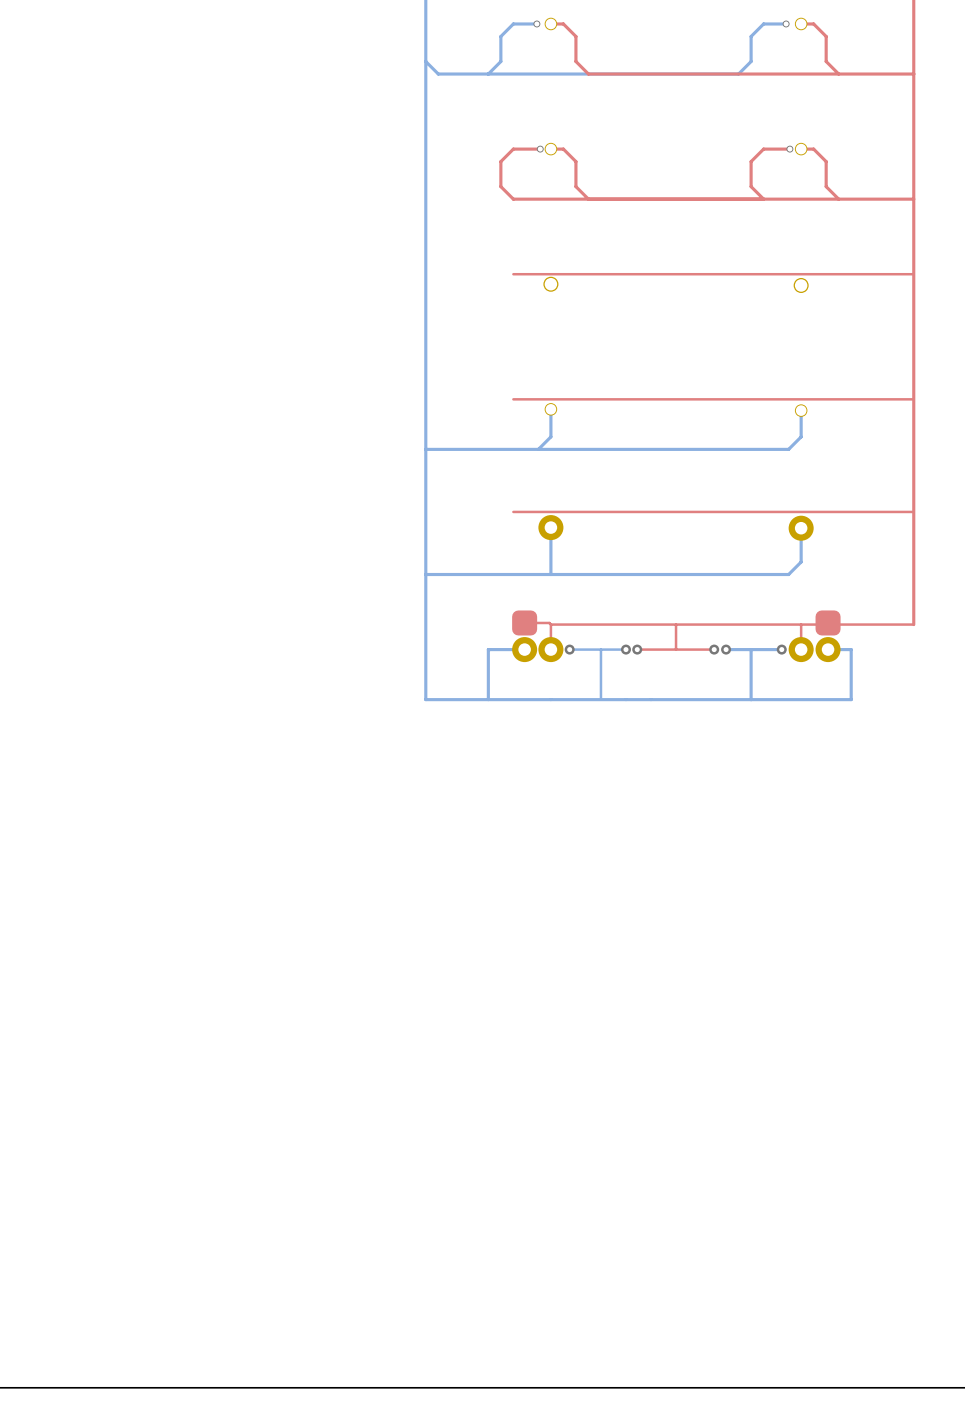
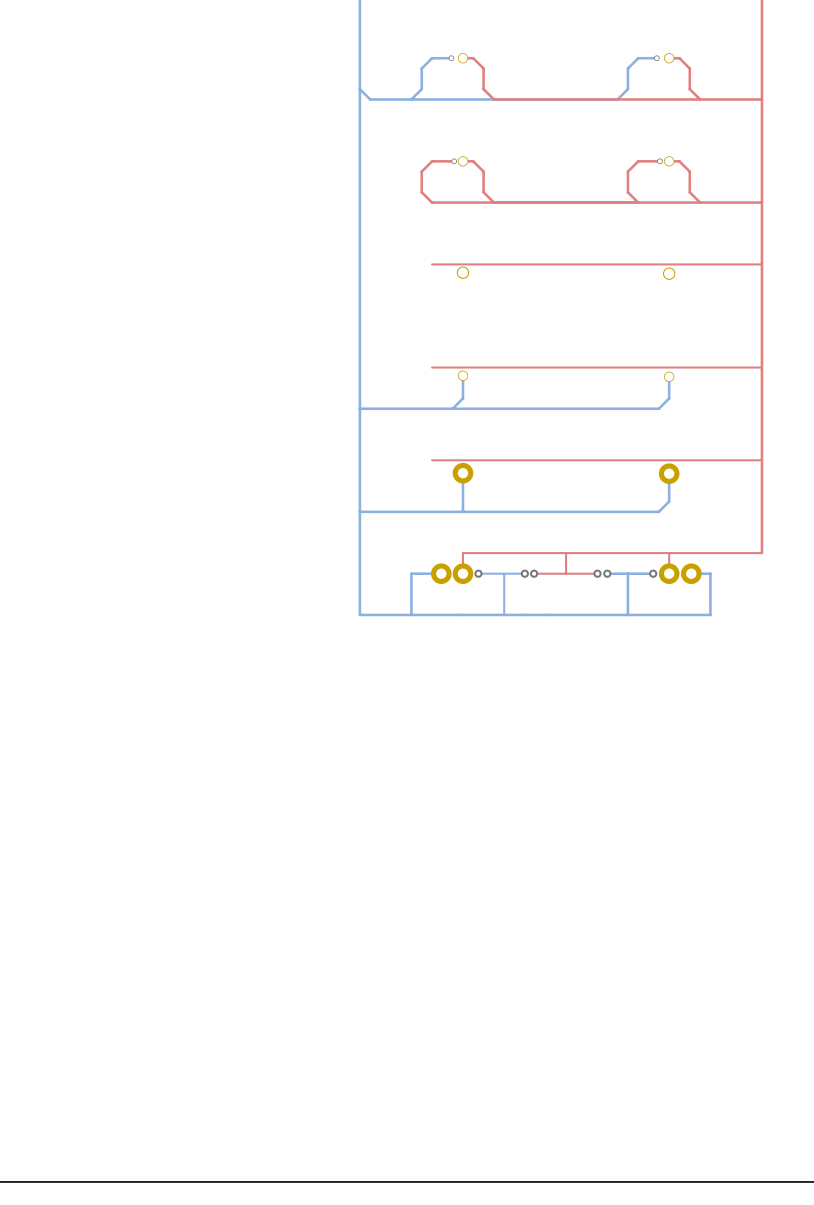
top track: (524, 622) (550, 624) -> none
part: (524, 622) -> none
part: (828, 622) -> none

